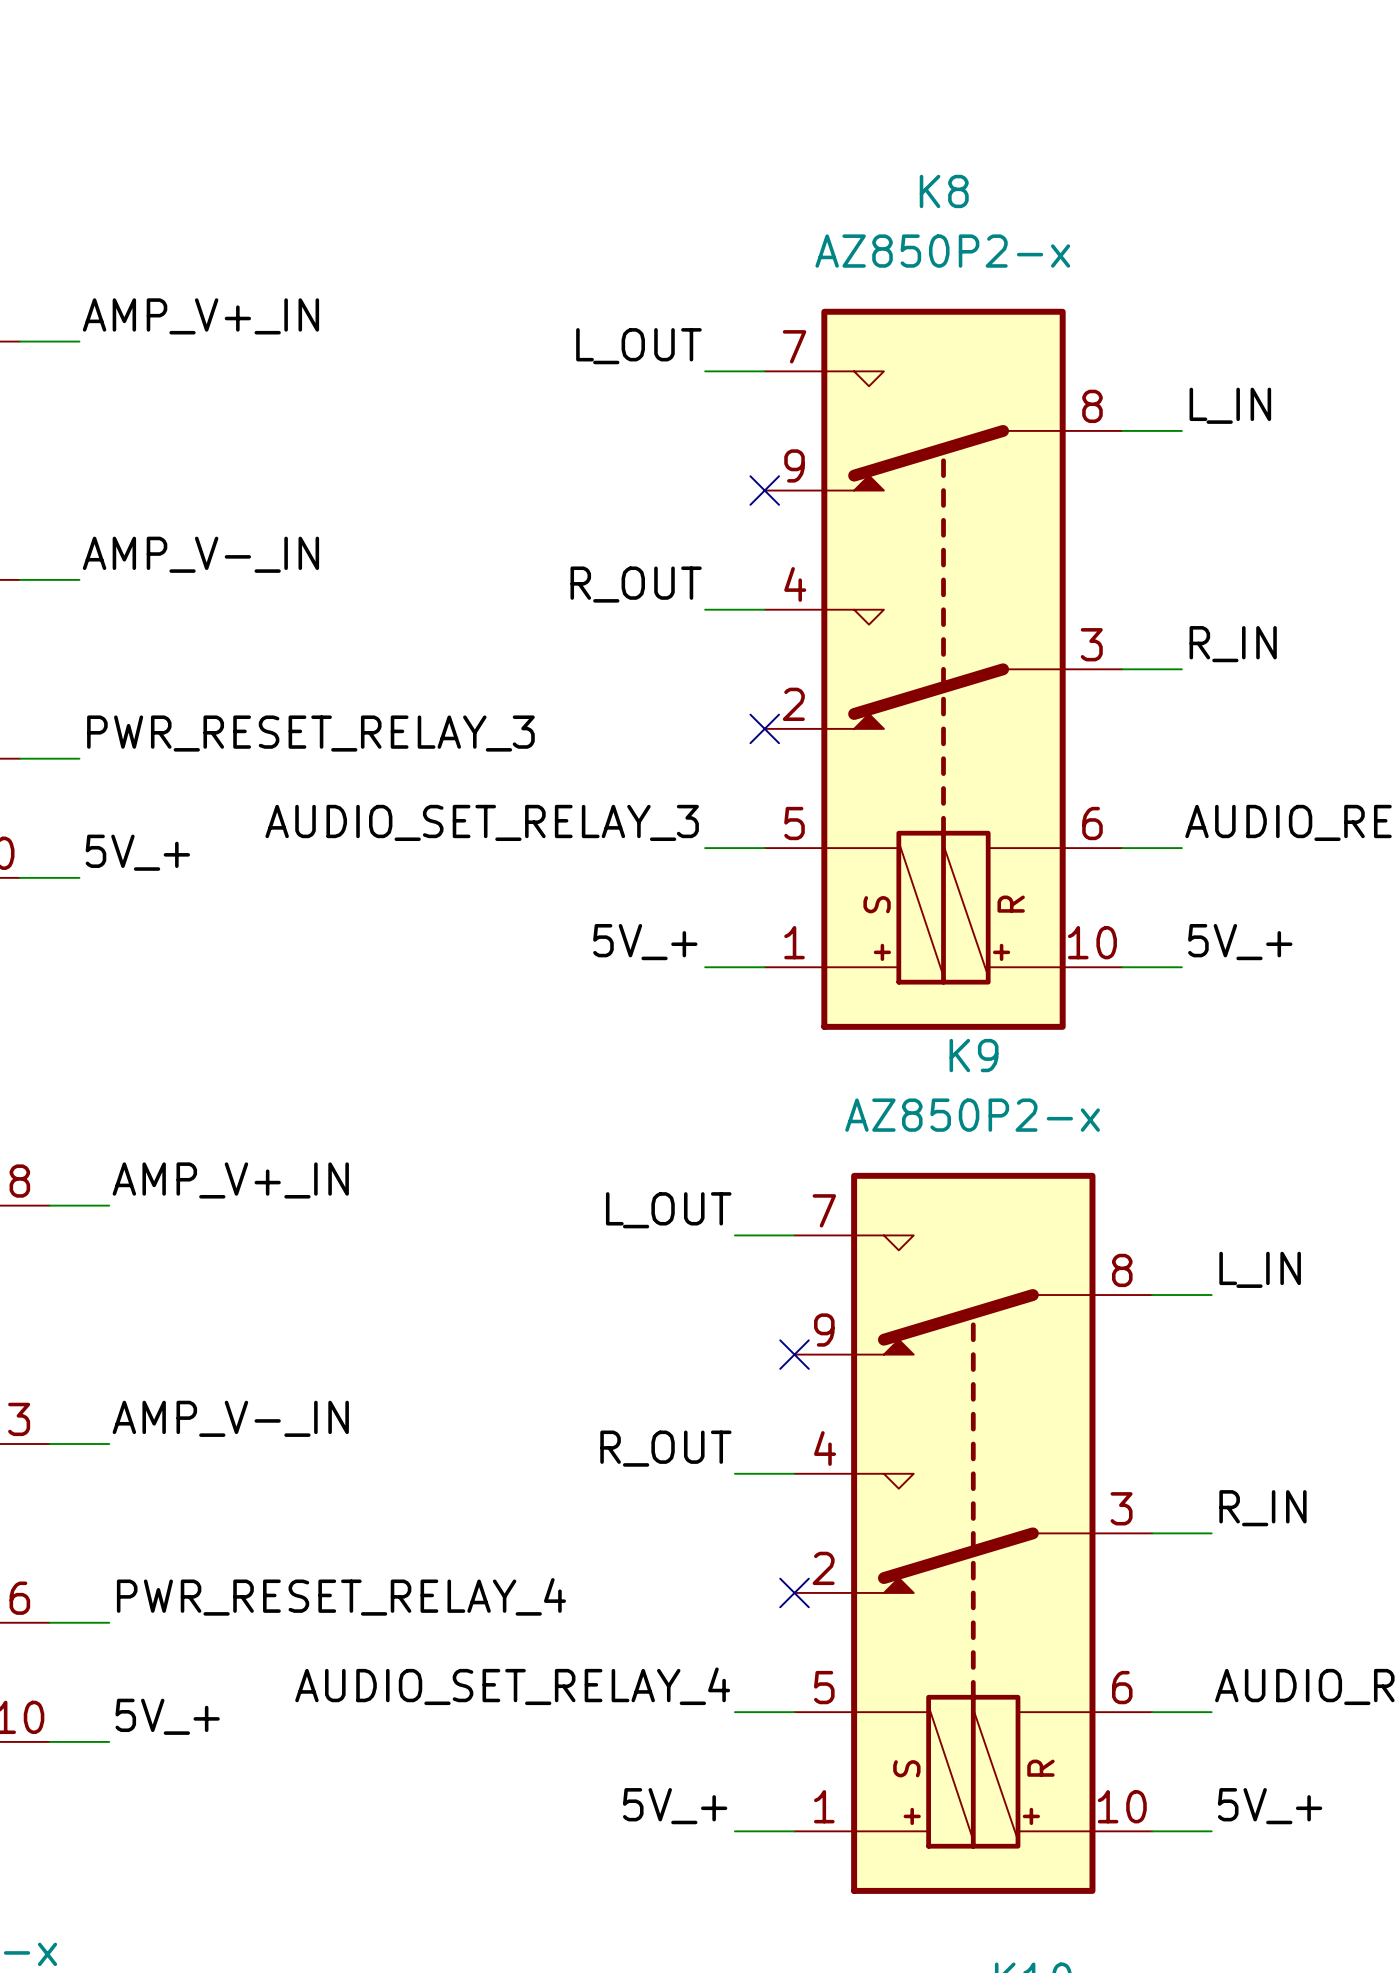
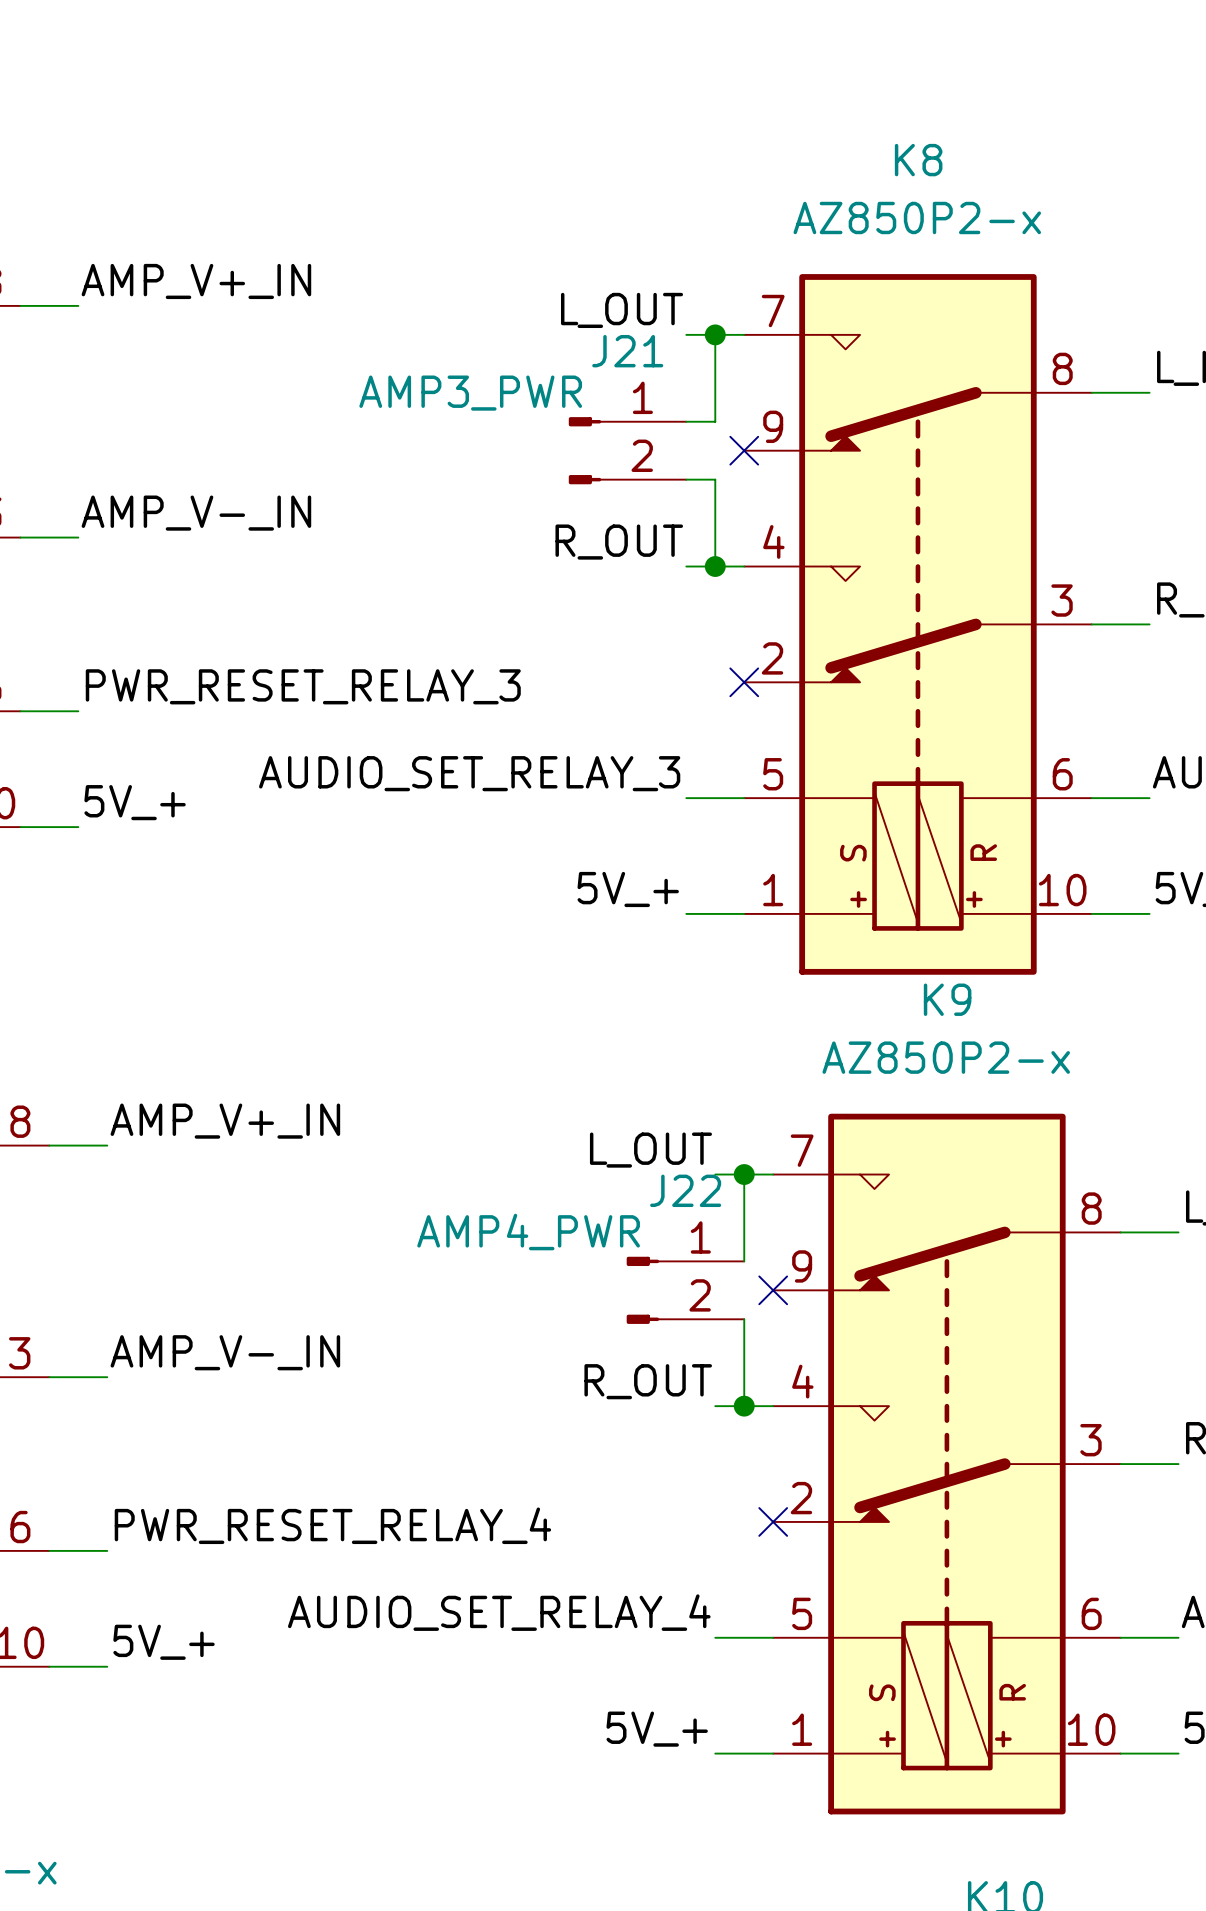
wire: none -> (715, 334) (715, 421) (686, 421)
junction: none -> (715, 334)
J21: none -> AMP3_PWR (627, 450)
wire: none -> (686, 479) (715, 479) (715, 566)
junction: none -> (715, 566)
wire: none -> (744, 1174) (744, 1261)
junction: none -> (744, 1174)
J22: none -> AMP4_PWR (685, 1290)
wire: none -> (744, 1319) (744, 1406)
junction: none -> (744, 1406)

